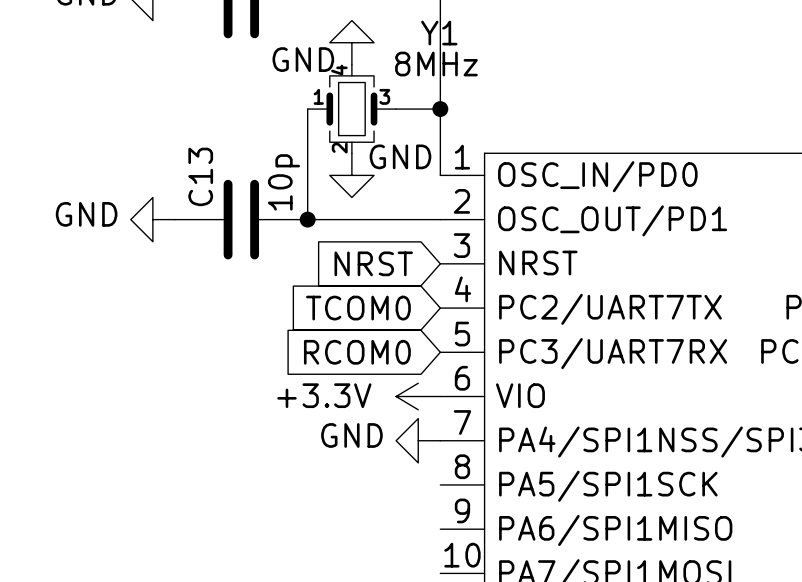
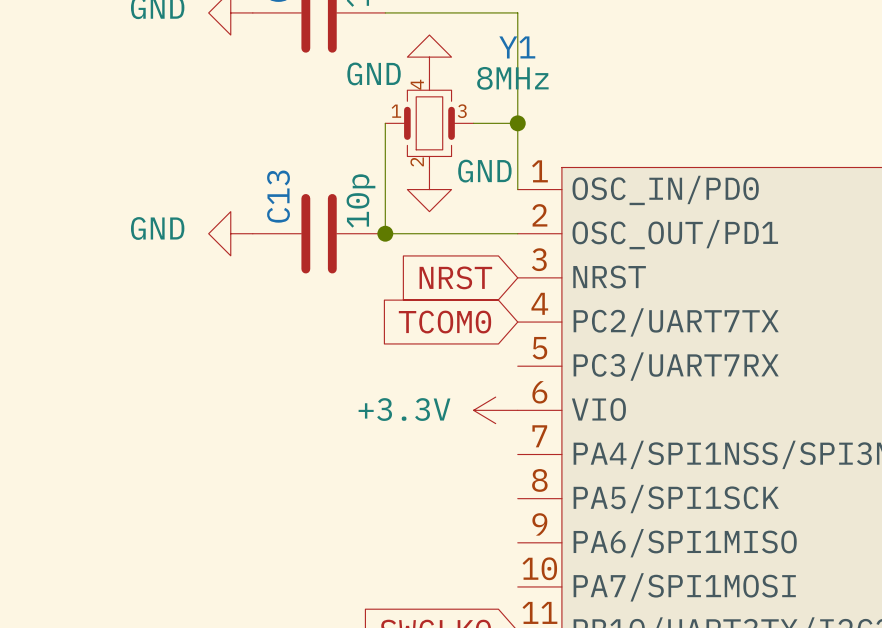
global label: RCOM0 (357, 352) -> none
power symbol: GND (418, 440) -> none

